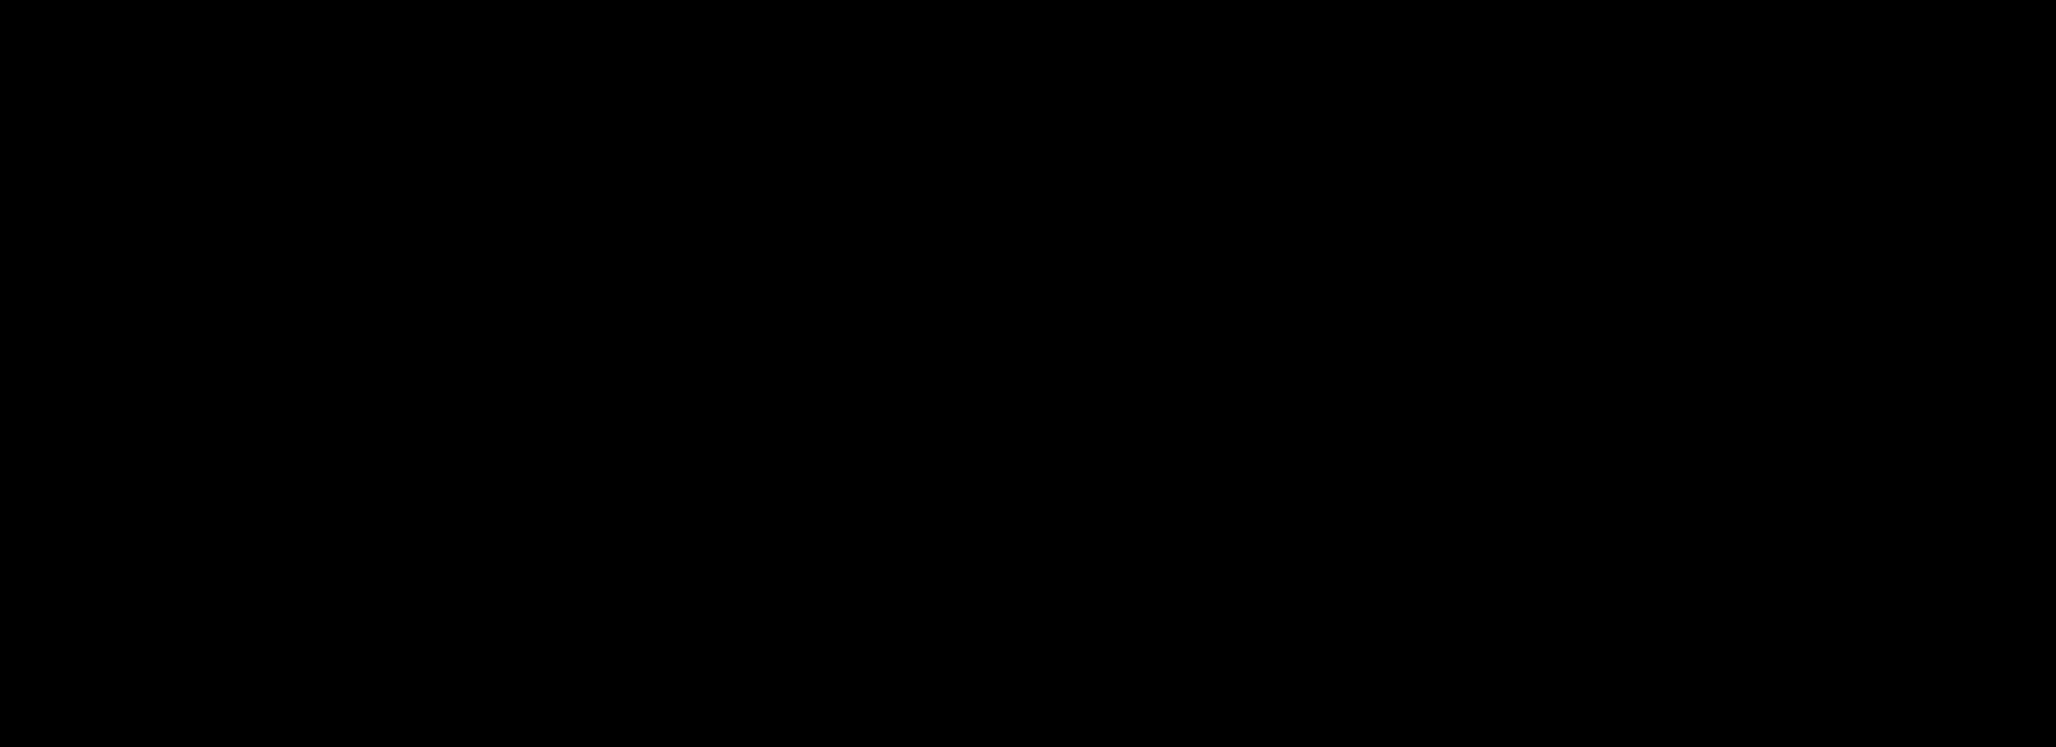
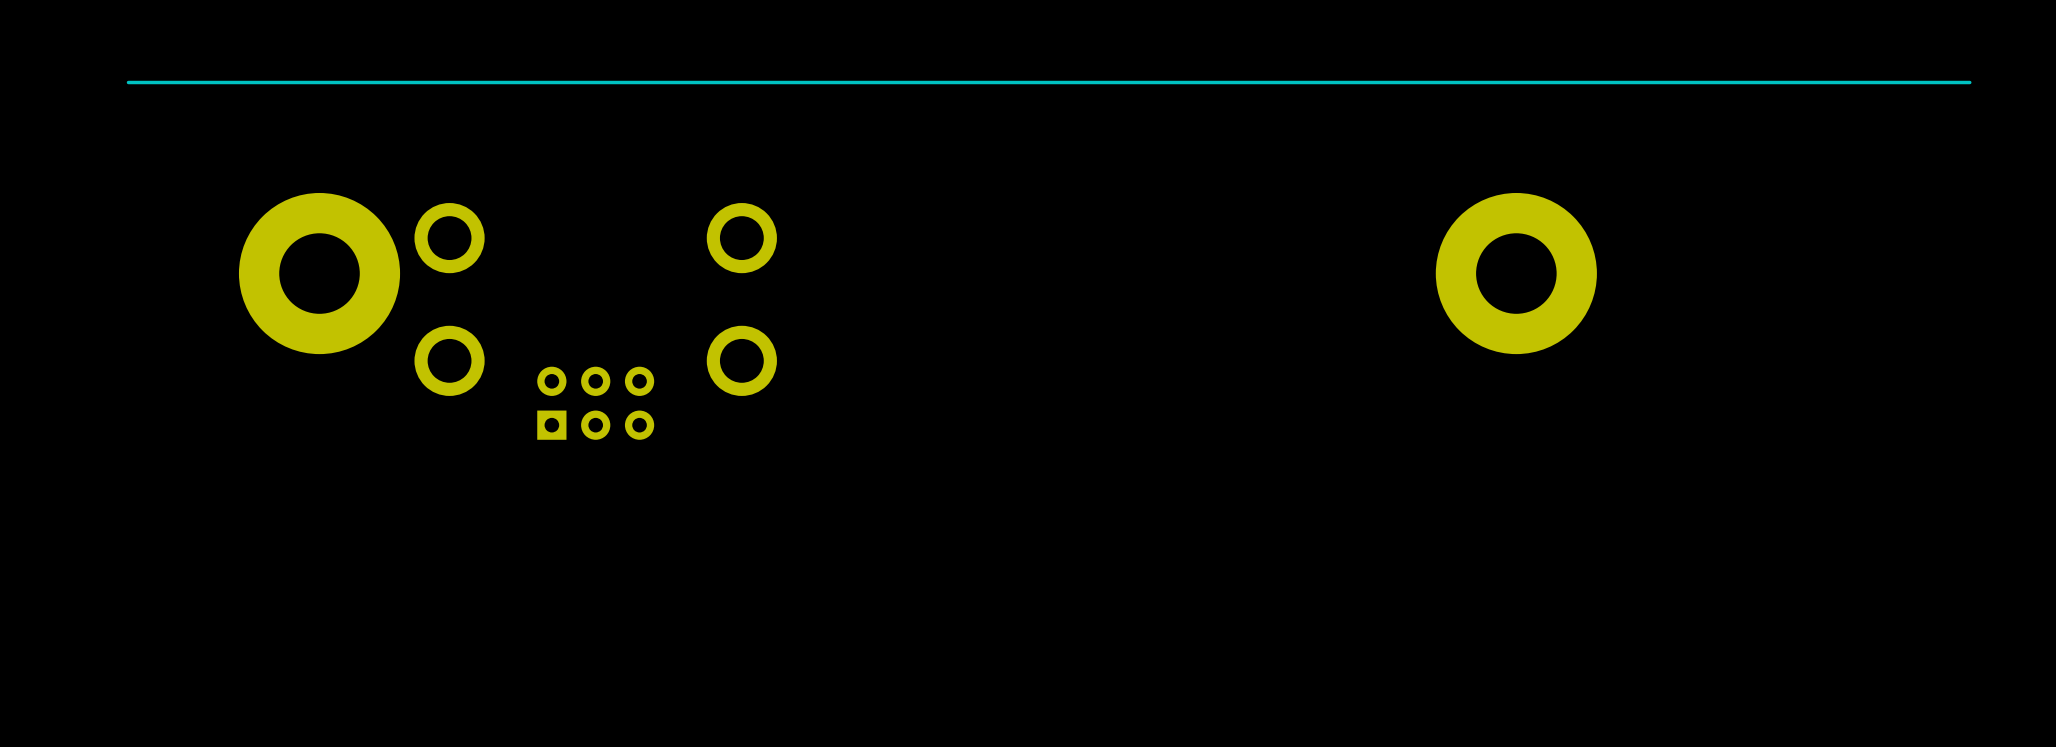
line: none -> (1969, 82) (128, 82)
part: none -> (319, 273)
part: none -> (1516, 273)
part: none -> (595, 321)

